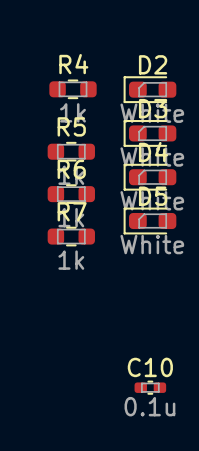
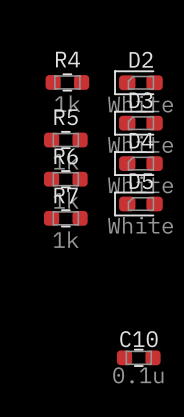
C10 footprint: [134, 380, 167, 395] -> [116, 348, 161, 367]

